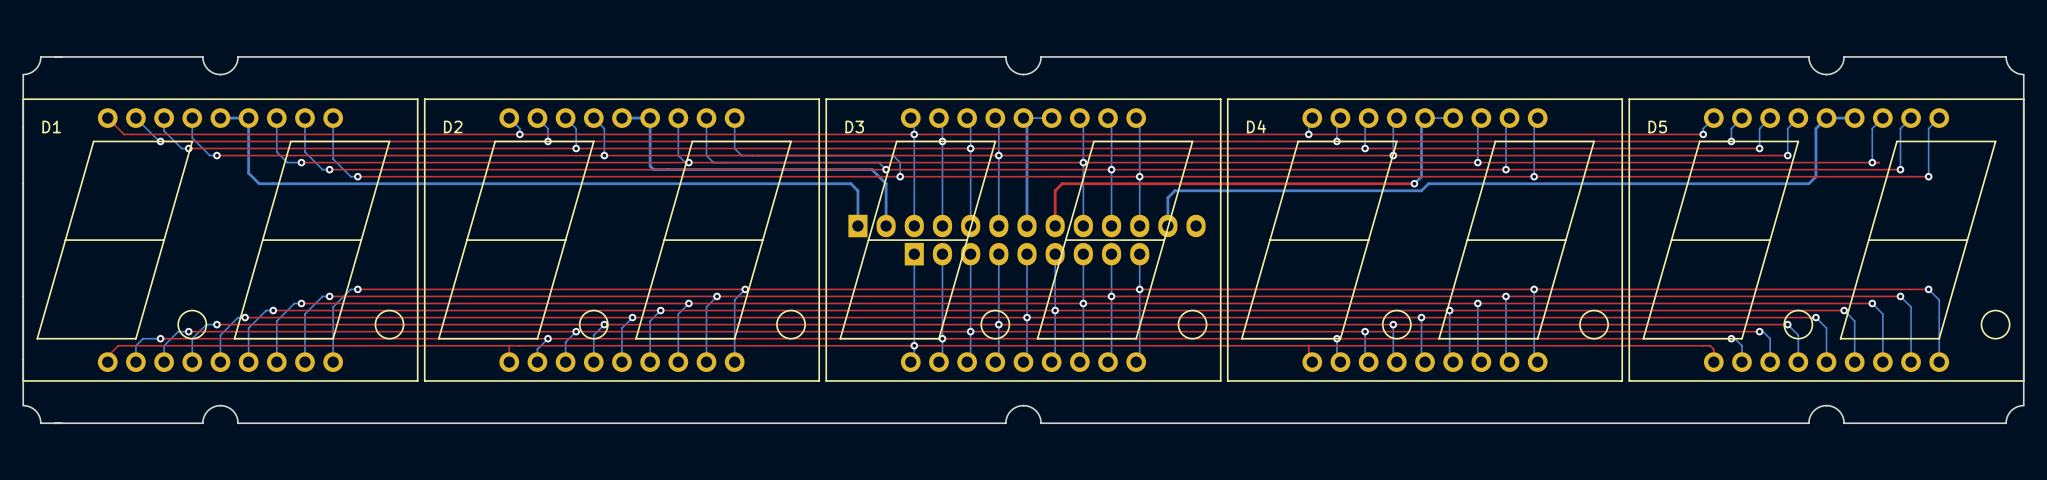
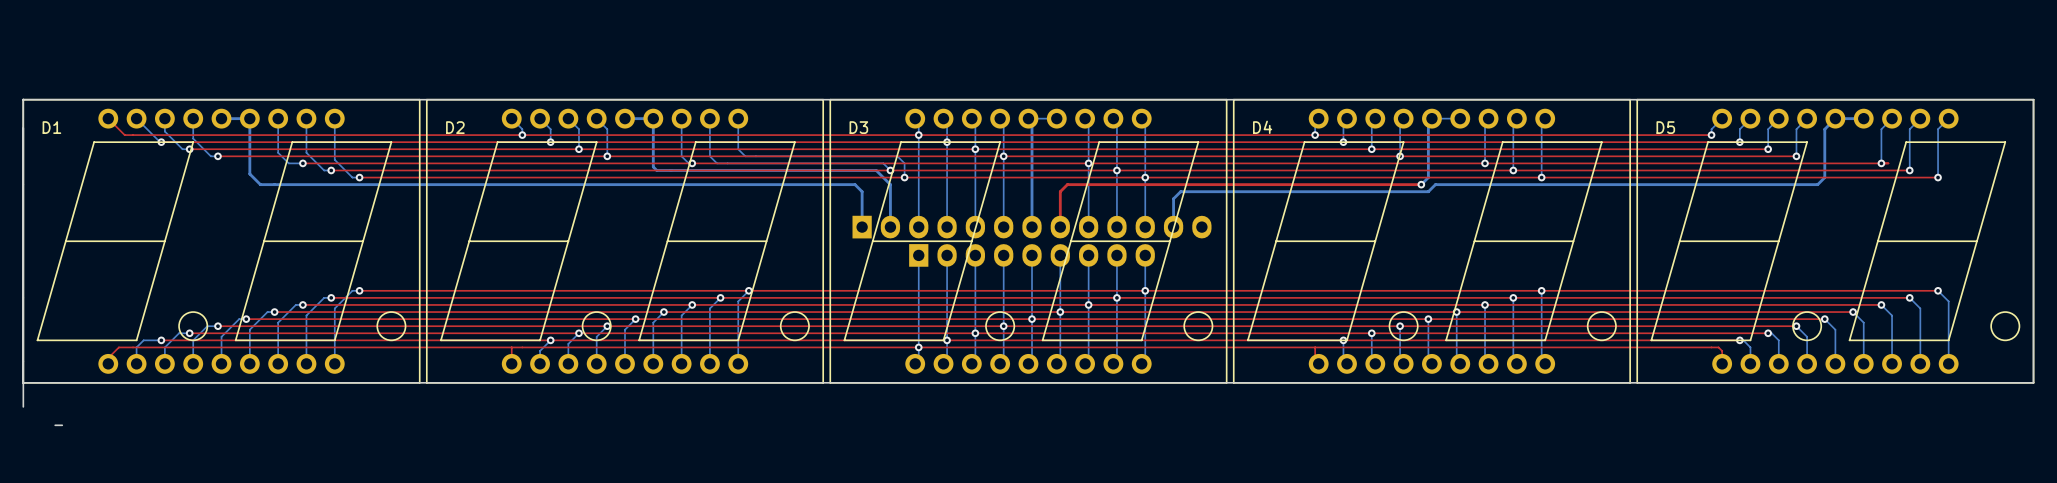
board edge: (1005, 56) (1011, 69) (1023, 74) (1035, 69) (1041, 56) (1808, 56) -> none
board edge: (1005, 56) (238, 56) (232, 69) (220, 74) (208, 69) (202, 56) (40, 56) (35, 69) (23, 74) -> none
board edge: (1808, 56) (1814, 69) (1826, 74) (1838, 69) (1844, 56) (2006, 56) -> none
board edge: (2006, 56) (2011, 69) (2023, 74) -> none
board edge: (23, 75) (23, 127) -> none
board edge: (2023, 75) (2023, 404) -> none
board edge: none -> (23, 99) (23, 382) (2033, 382) (2033, 99) (23, 99)
board edge: (23, 405) (35, 410) (40, 423) (54, 423) -> none
board edge: (2023, 405) (2011, 410) (2006, 423) (1844, 423) (1838, 410) (1826, 405) (1814, 410) (1808, 423) (1041, 423) (1035, 410) (1023, 405) (1011, 410) (1005, 423) (238, 423) (232, 410) (220, 405) (208, 410) (202, 423) (61, 423) -> none

